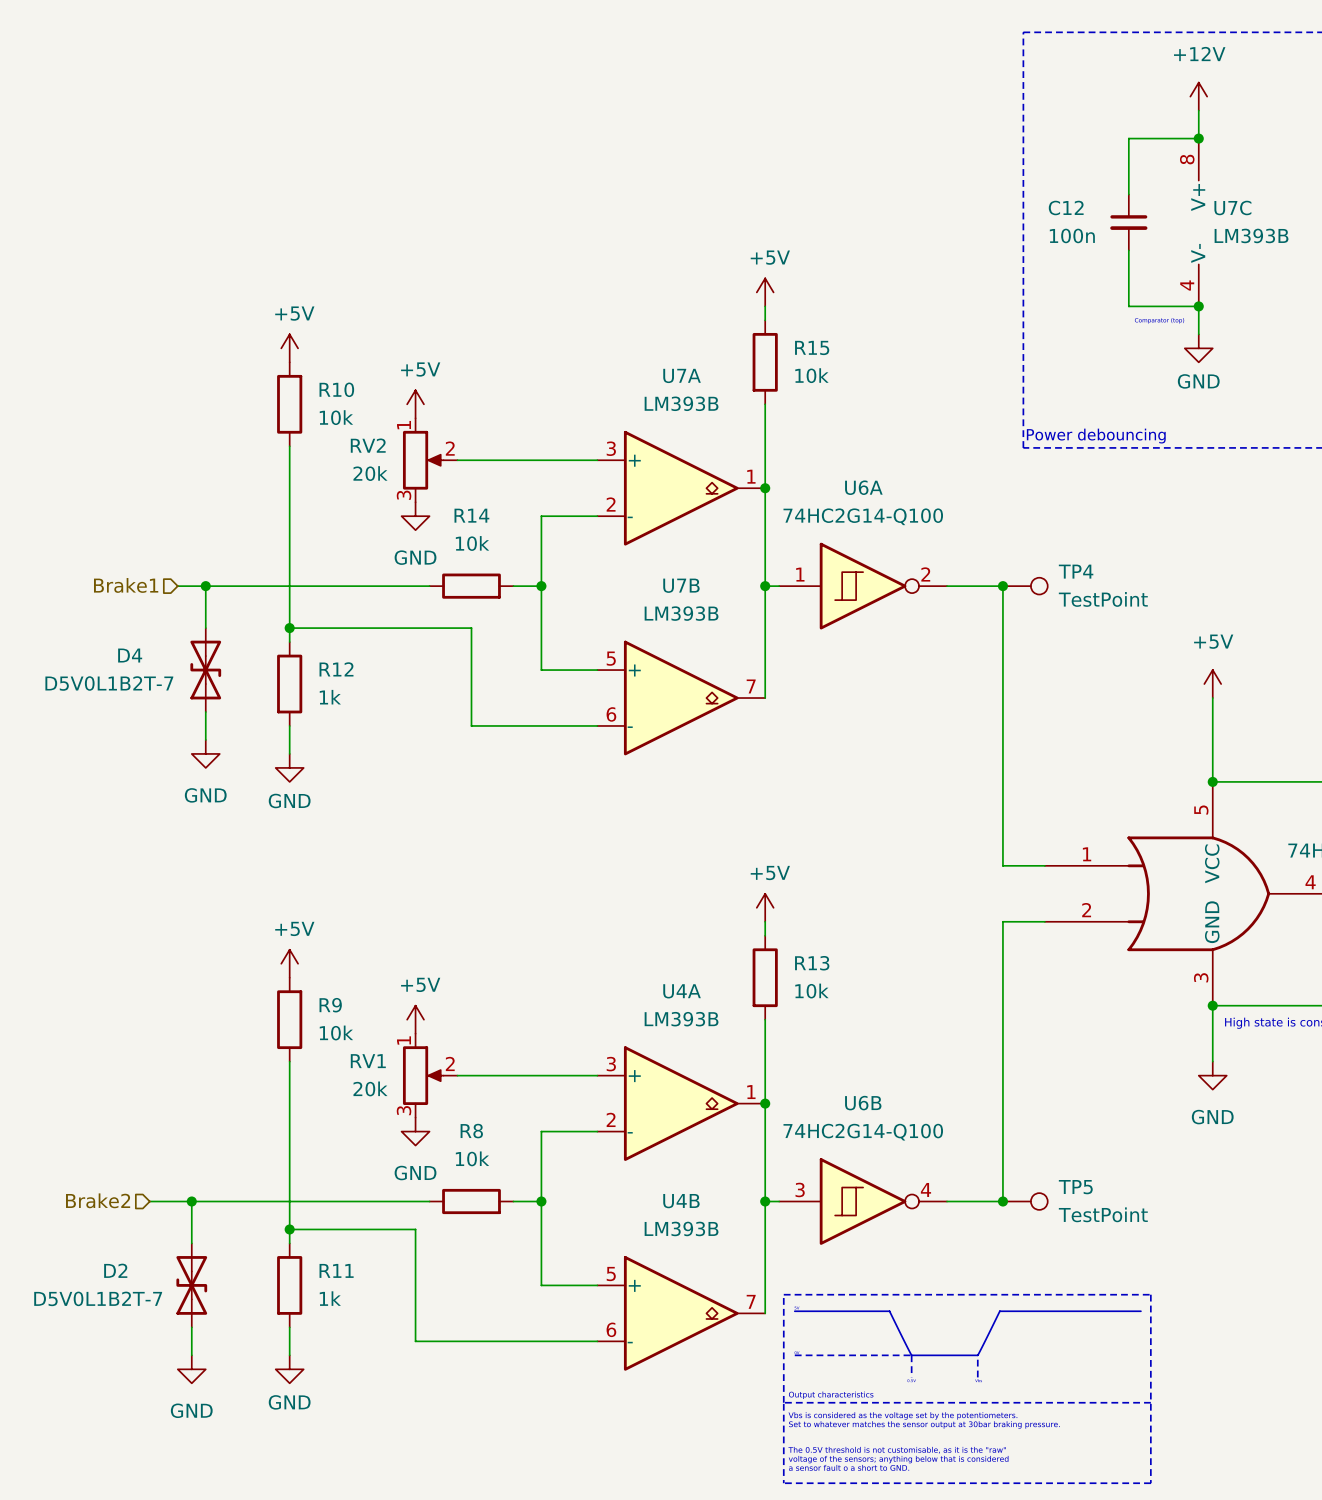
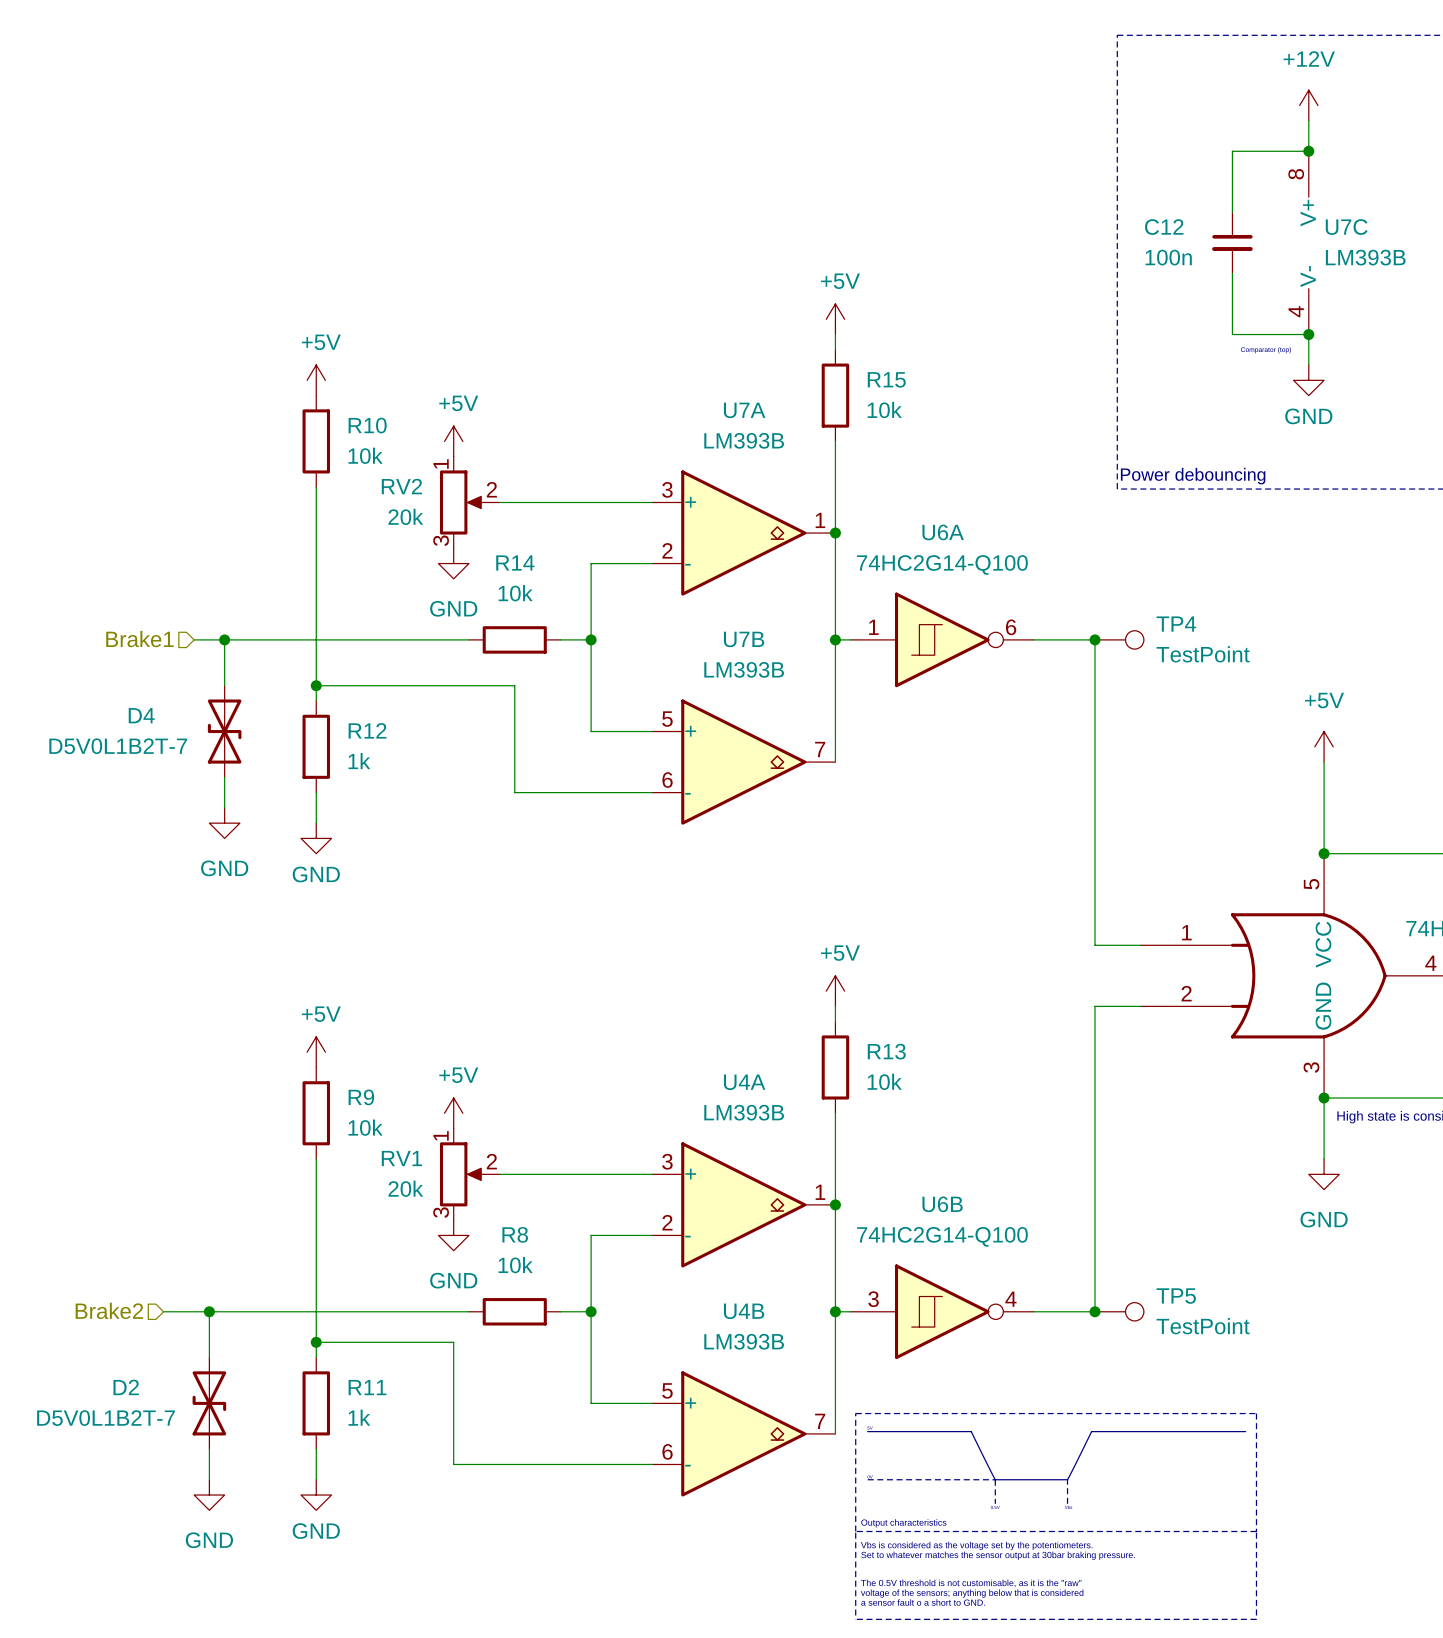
U6A pin number: 2 (925, 574) -> 6 (1011, 627)

